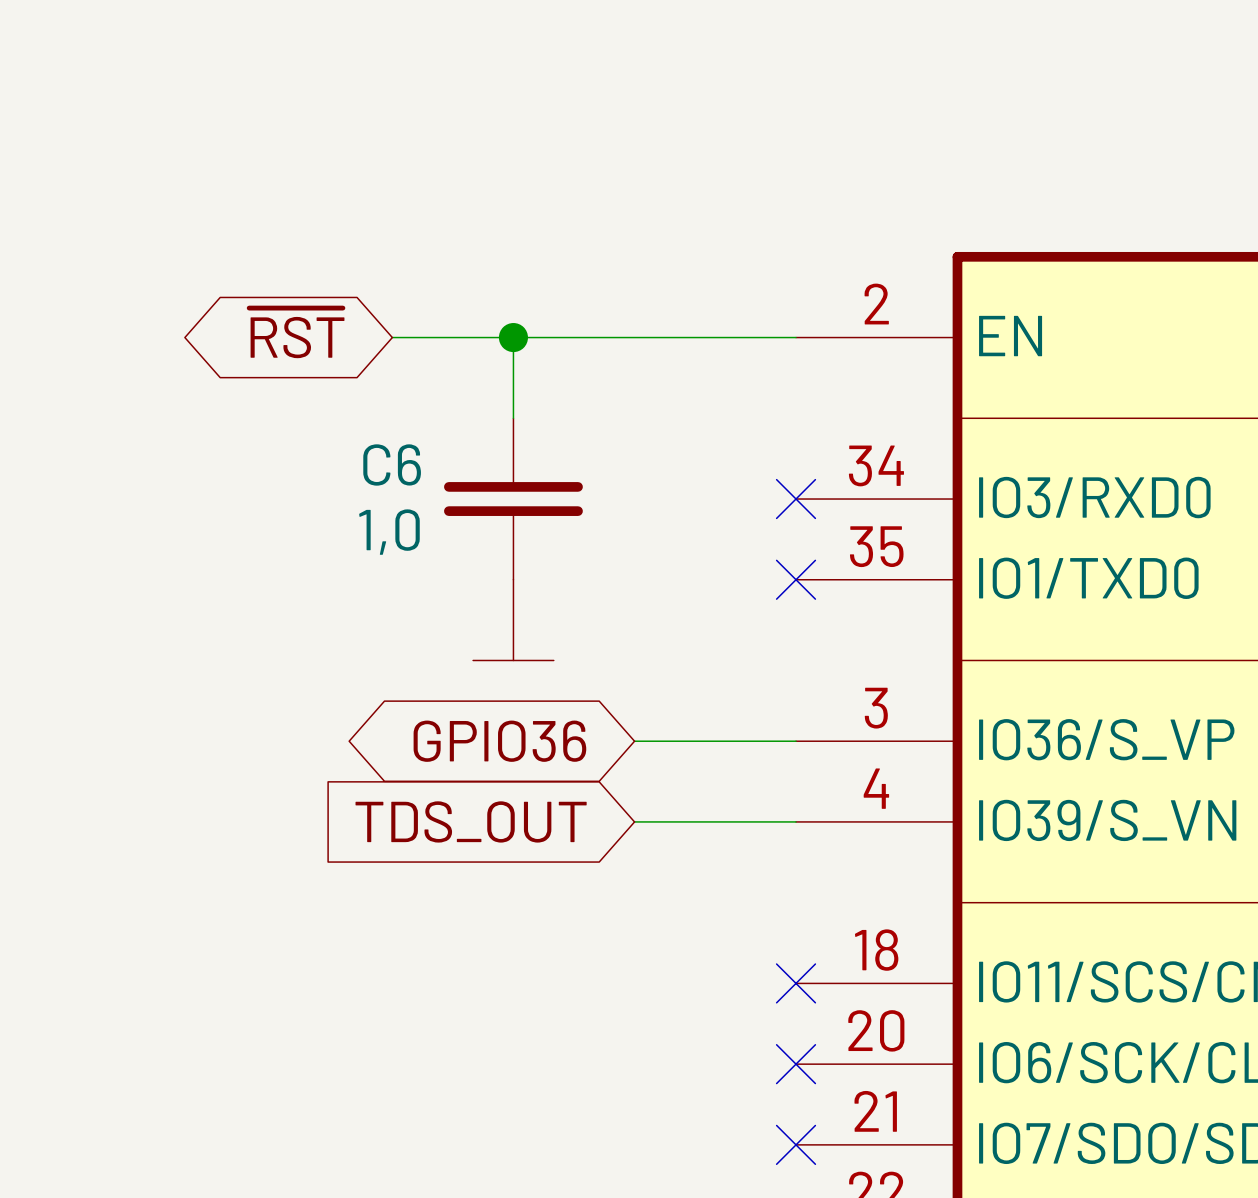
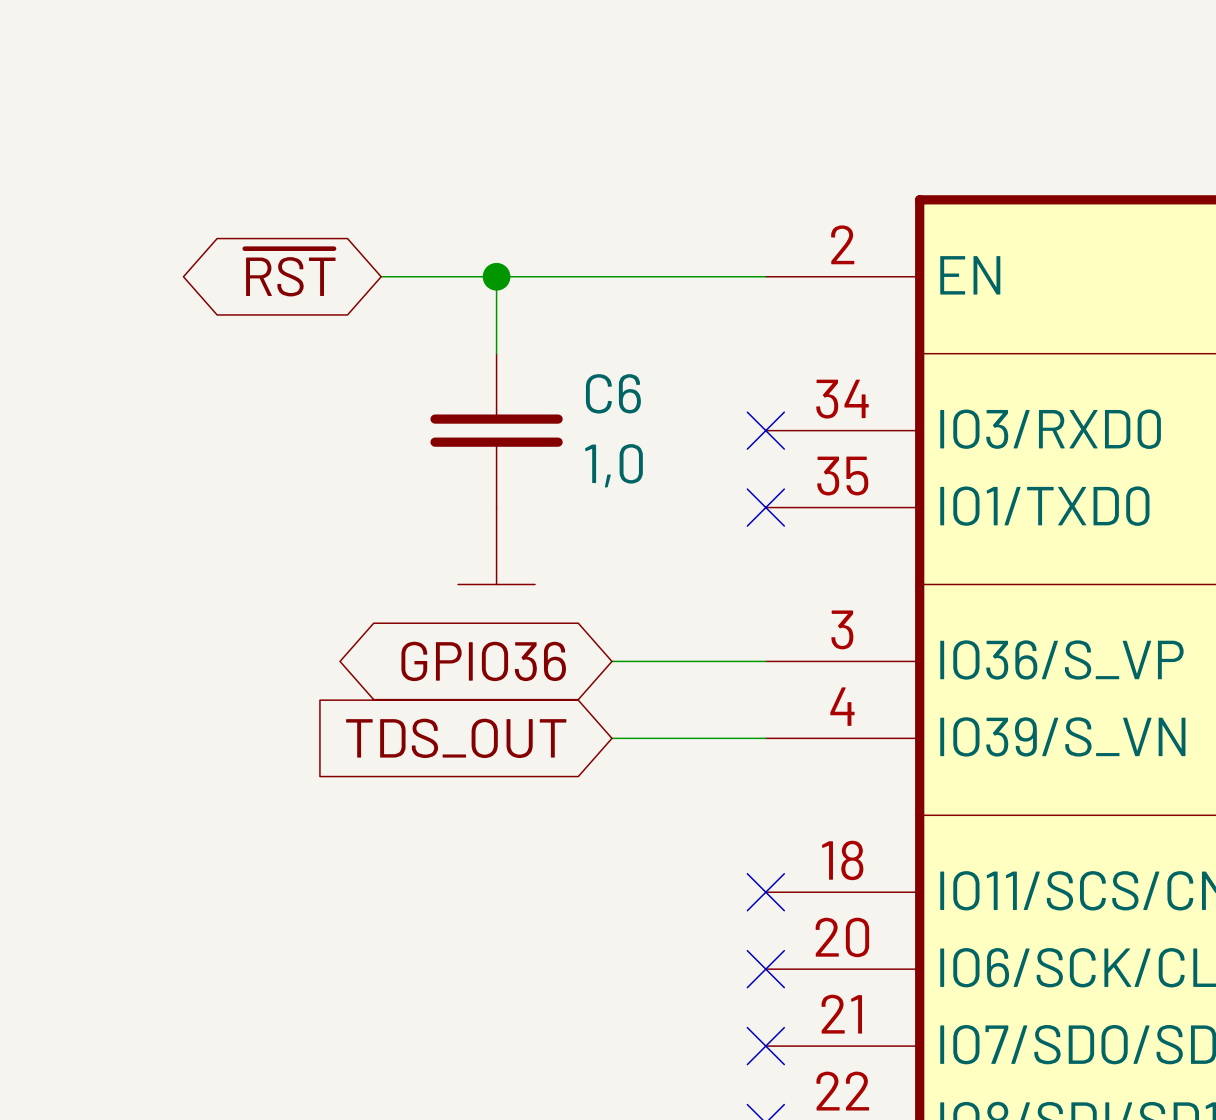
C6 name position: C6 (392, 464) -> C6 (613, 393)
C6 value position: 1,0 (389, 532) -> 1,0 (614, 465)

